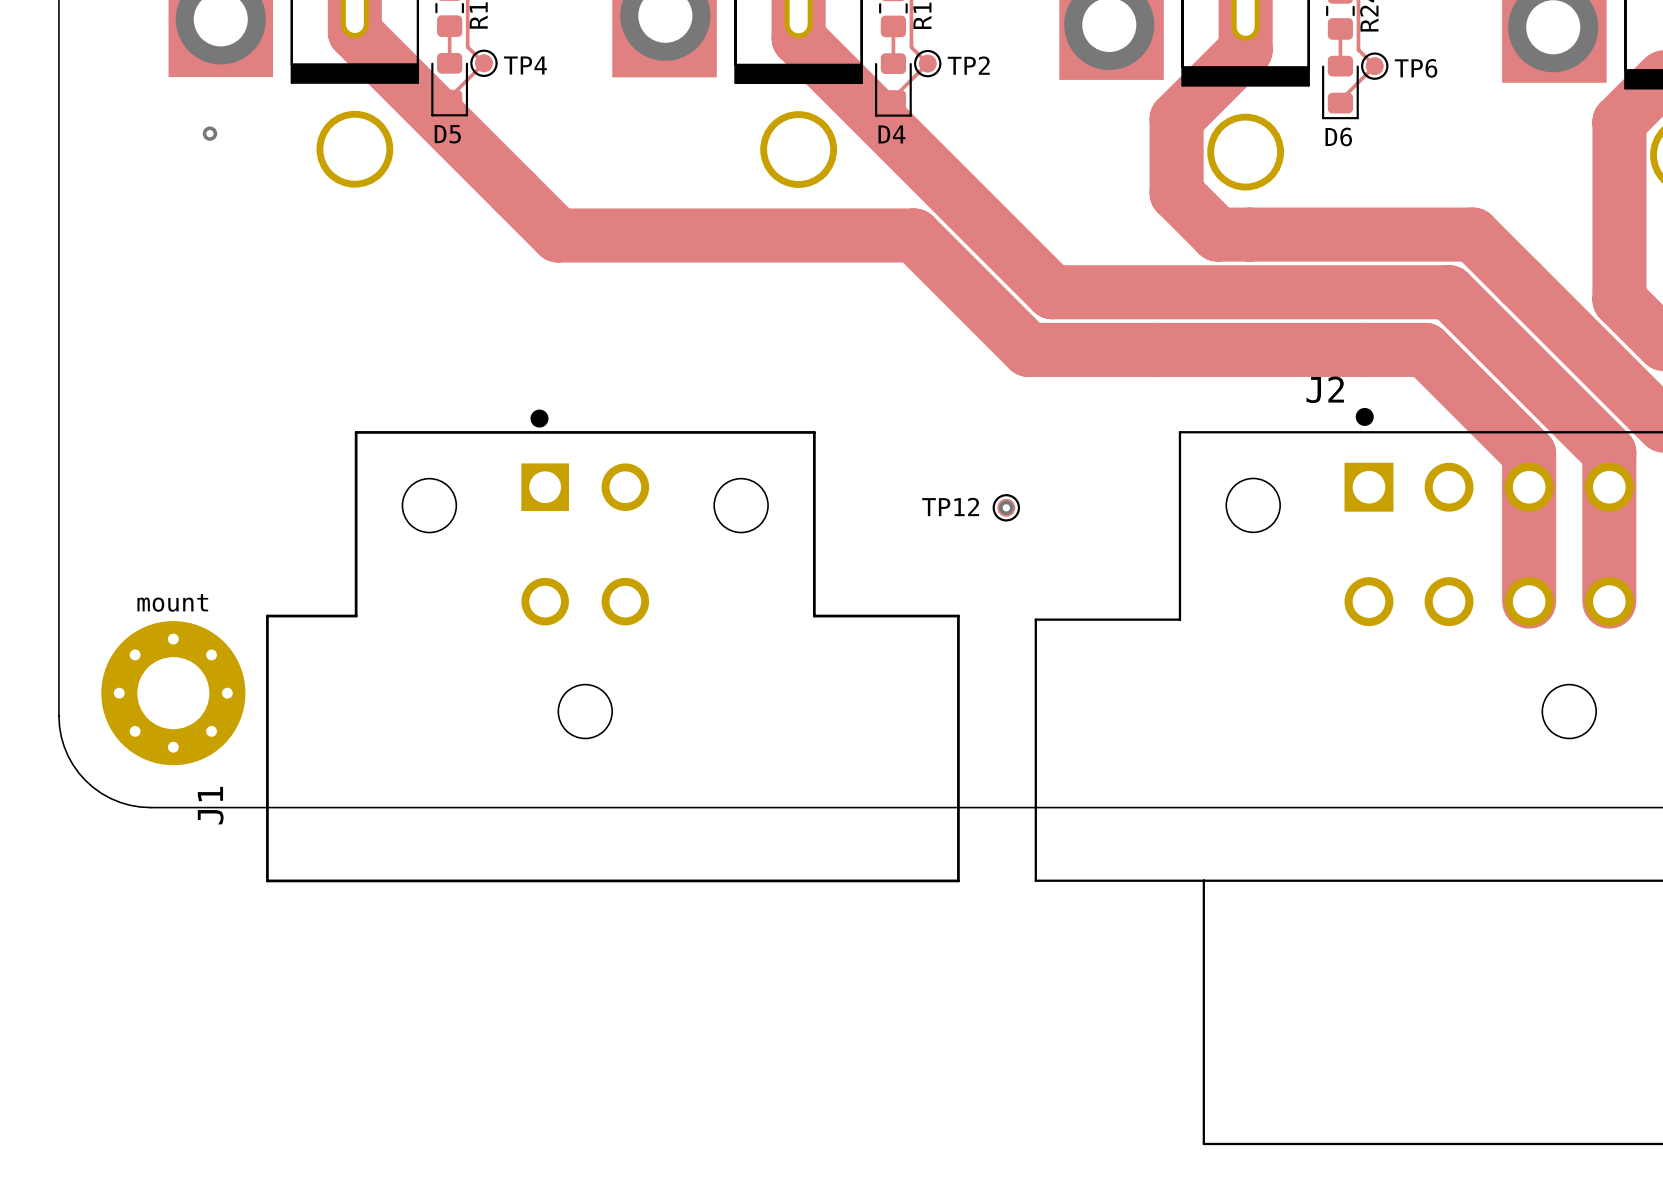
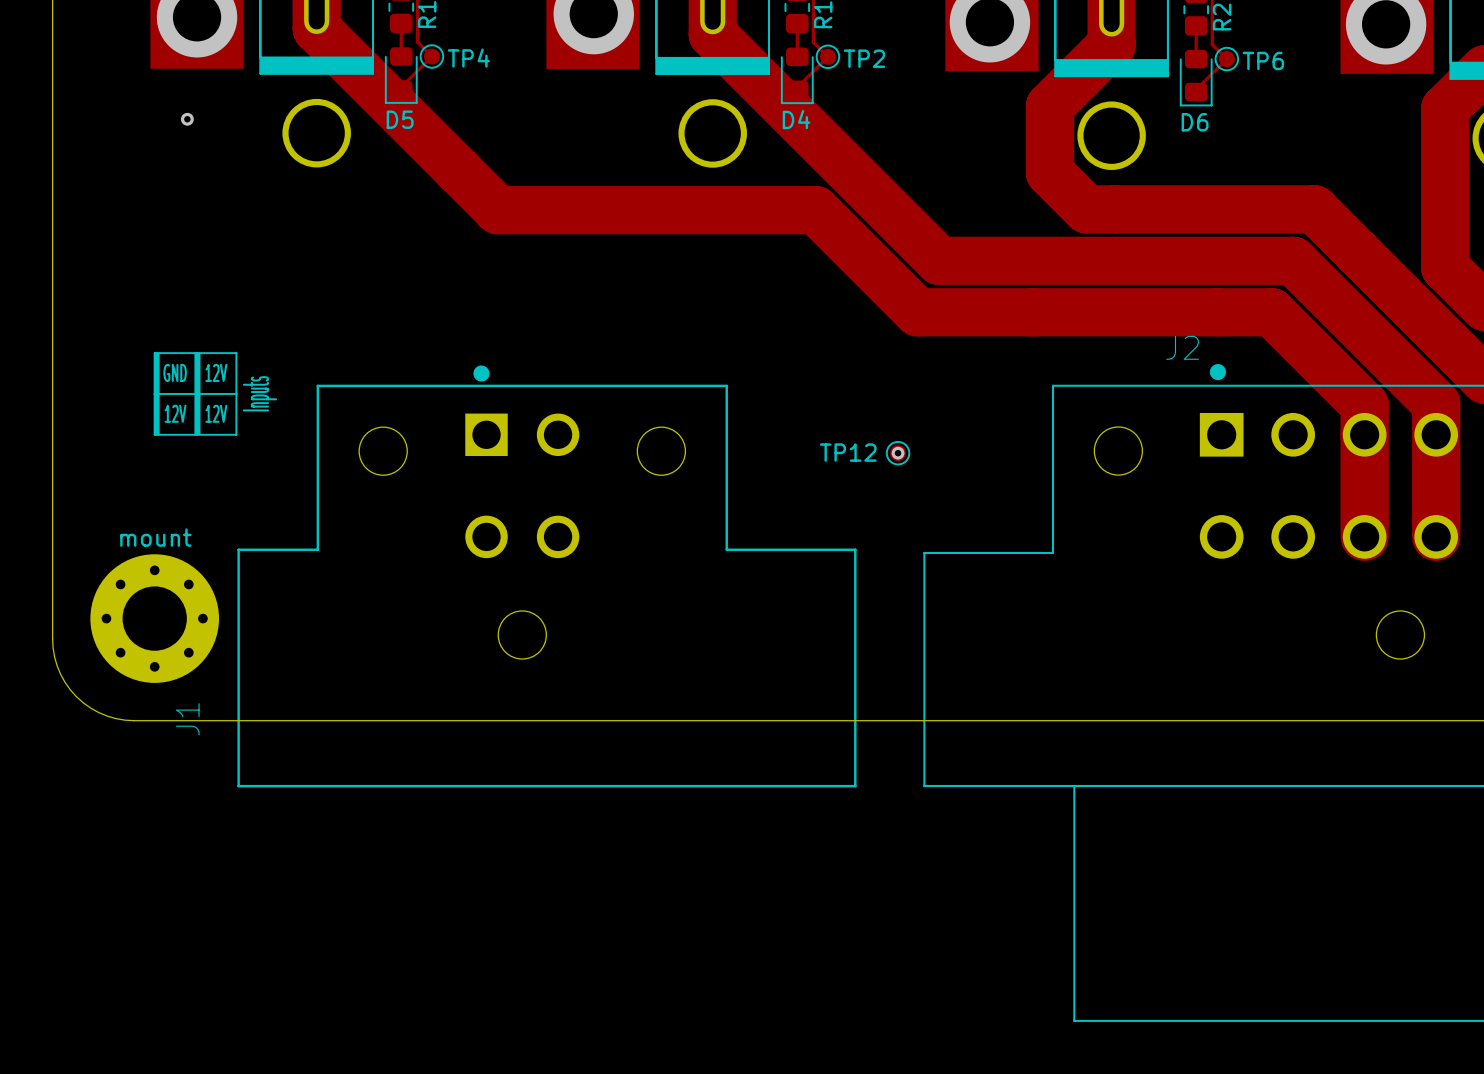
drawing: none -> [153, 352, 160, 436]
drawing: none -> [194, 352, 201, 436]
line: none -> (154, 353) (154, 434) (236, 434) (236, 353) (154, 353)
text: none -> GND (175, 372)
text: none -> 12V (216, 372)
line: none -> (154, 393) (236, 393)
text: none -> Inputs (259, 393)
text: none -> 12V (175, 413)
text: none -> 12V (216, 413)

